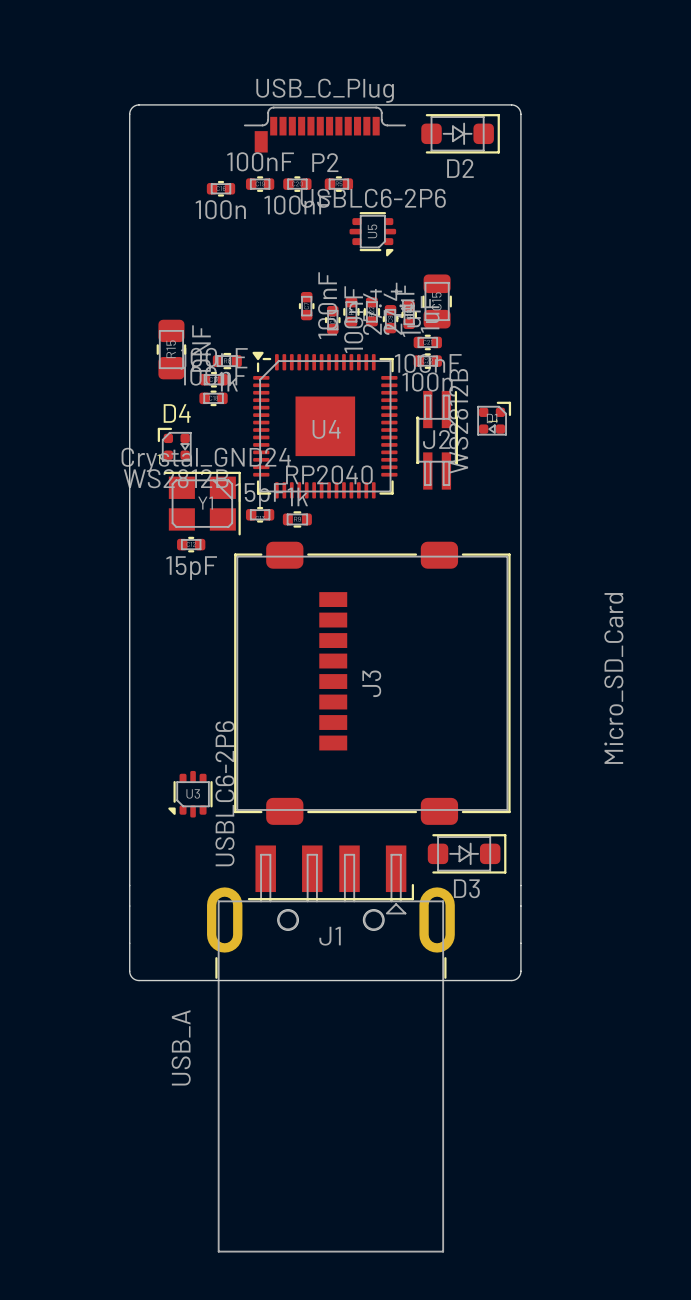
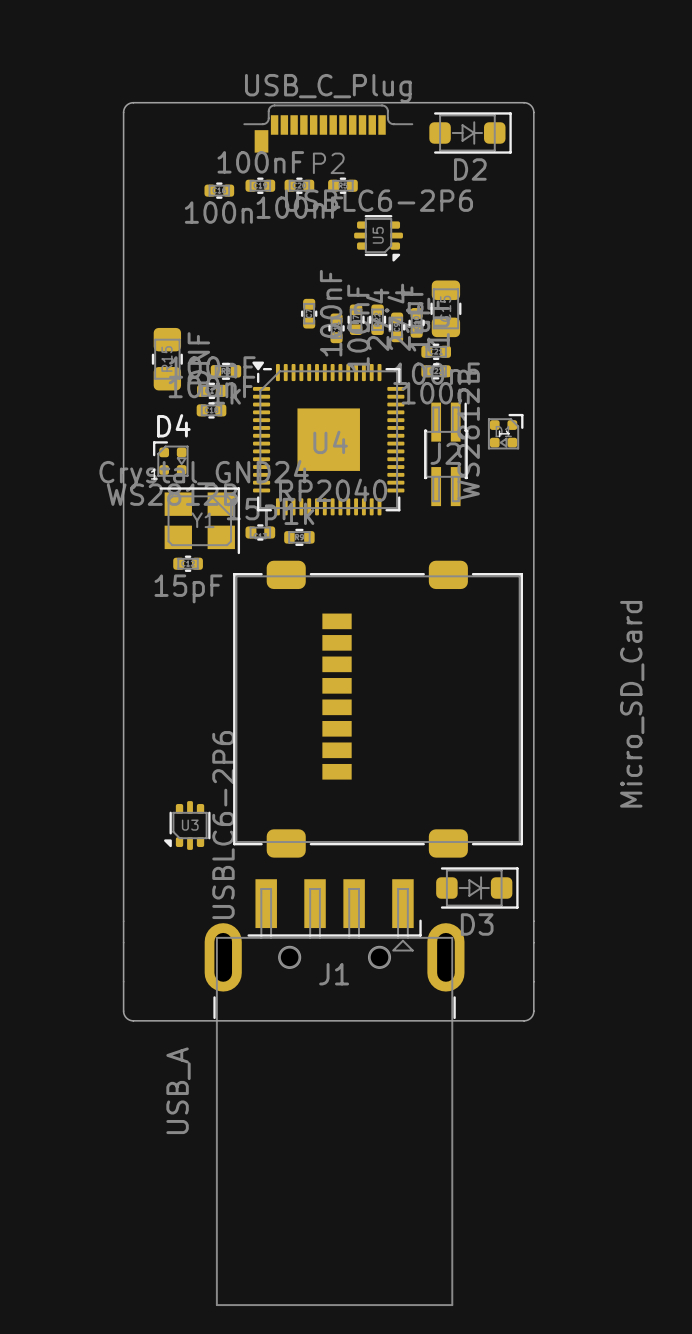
J3 name: J3 (371, 683) -> none

